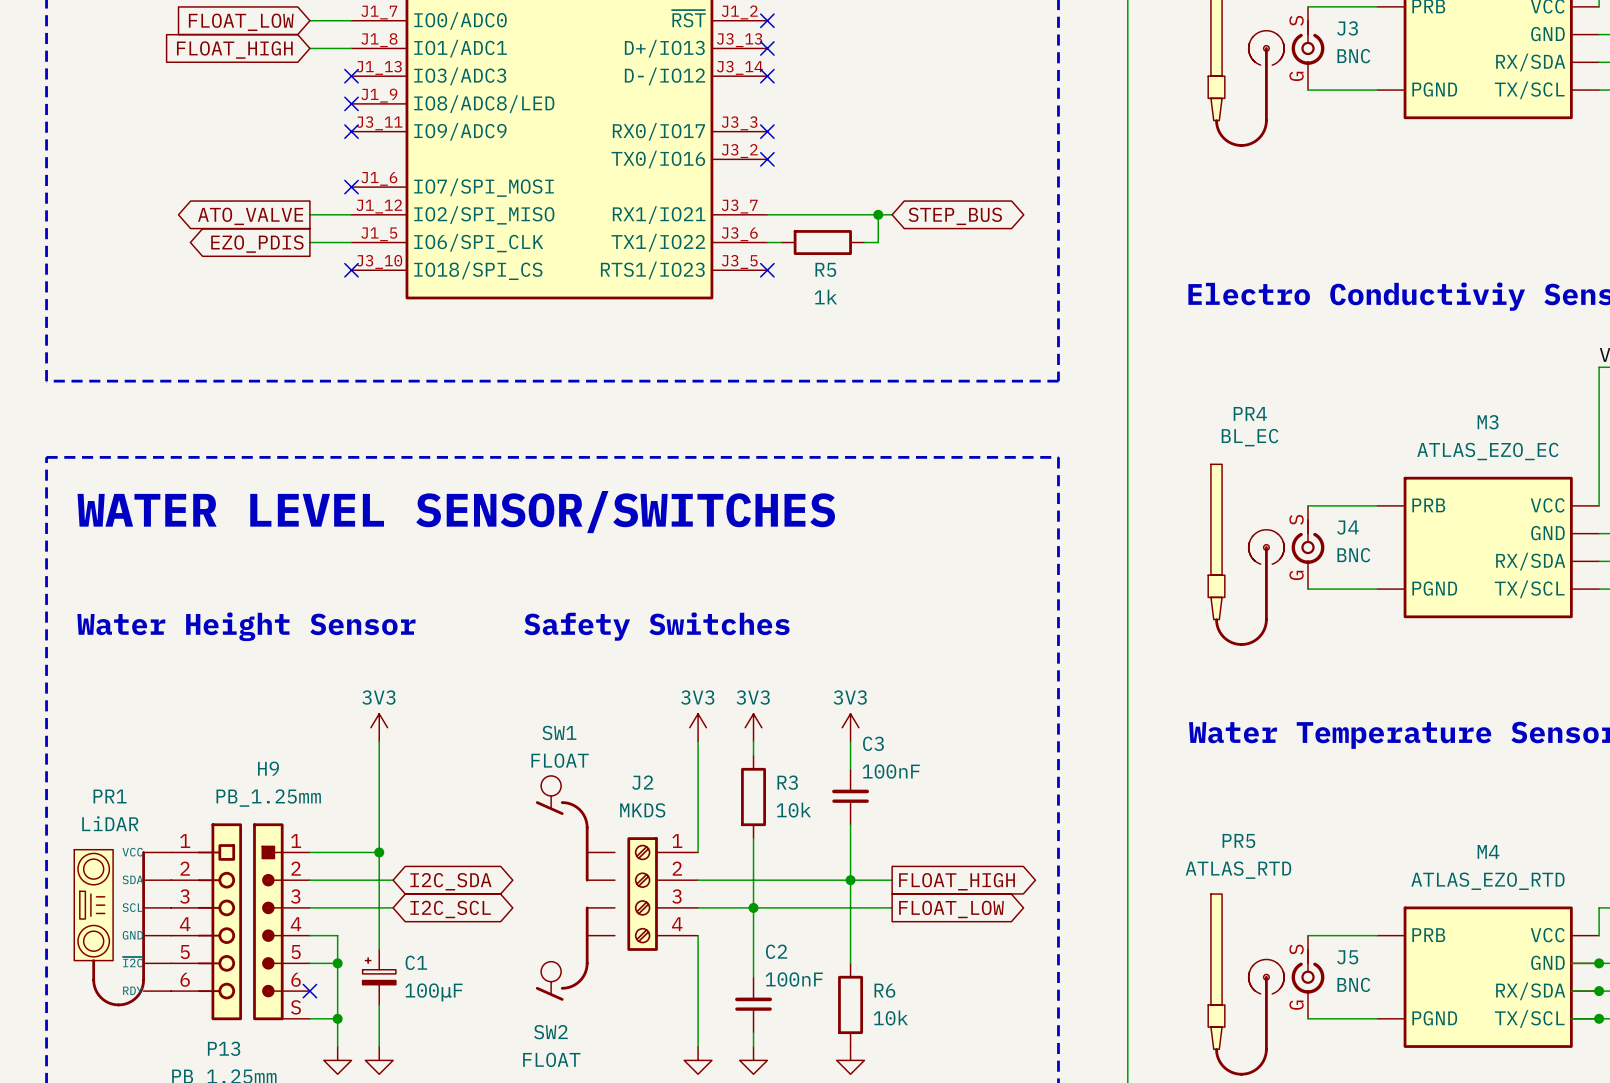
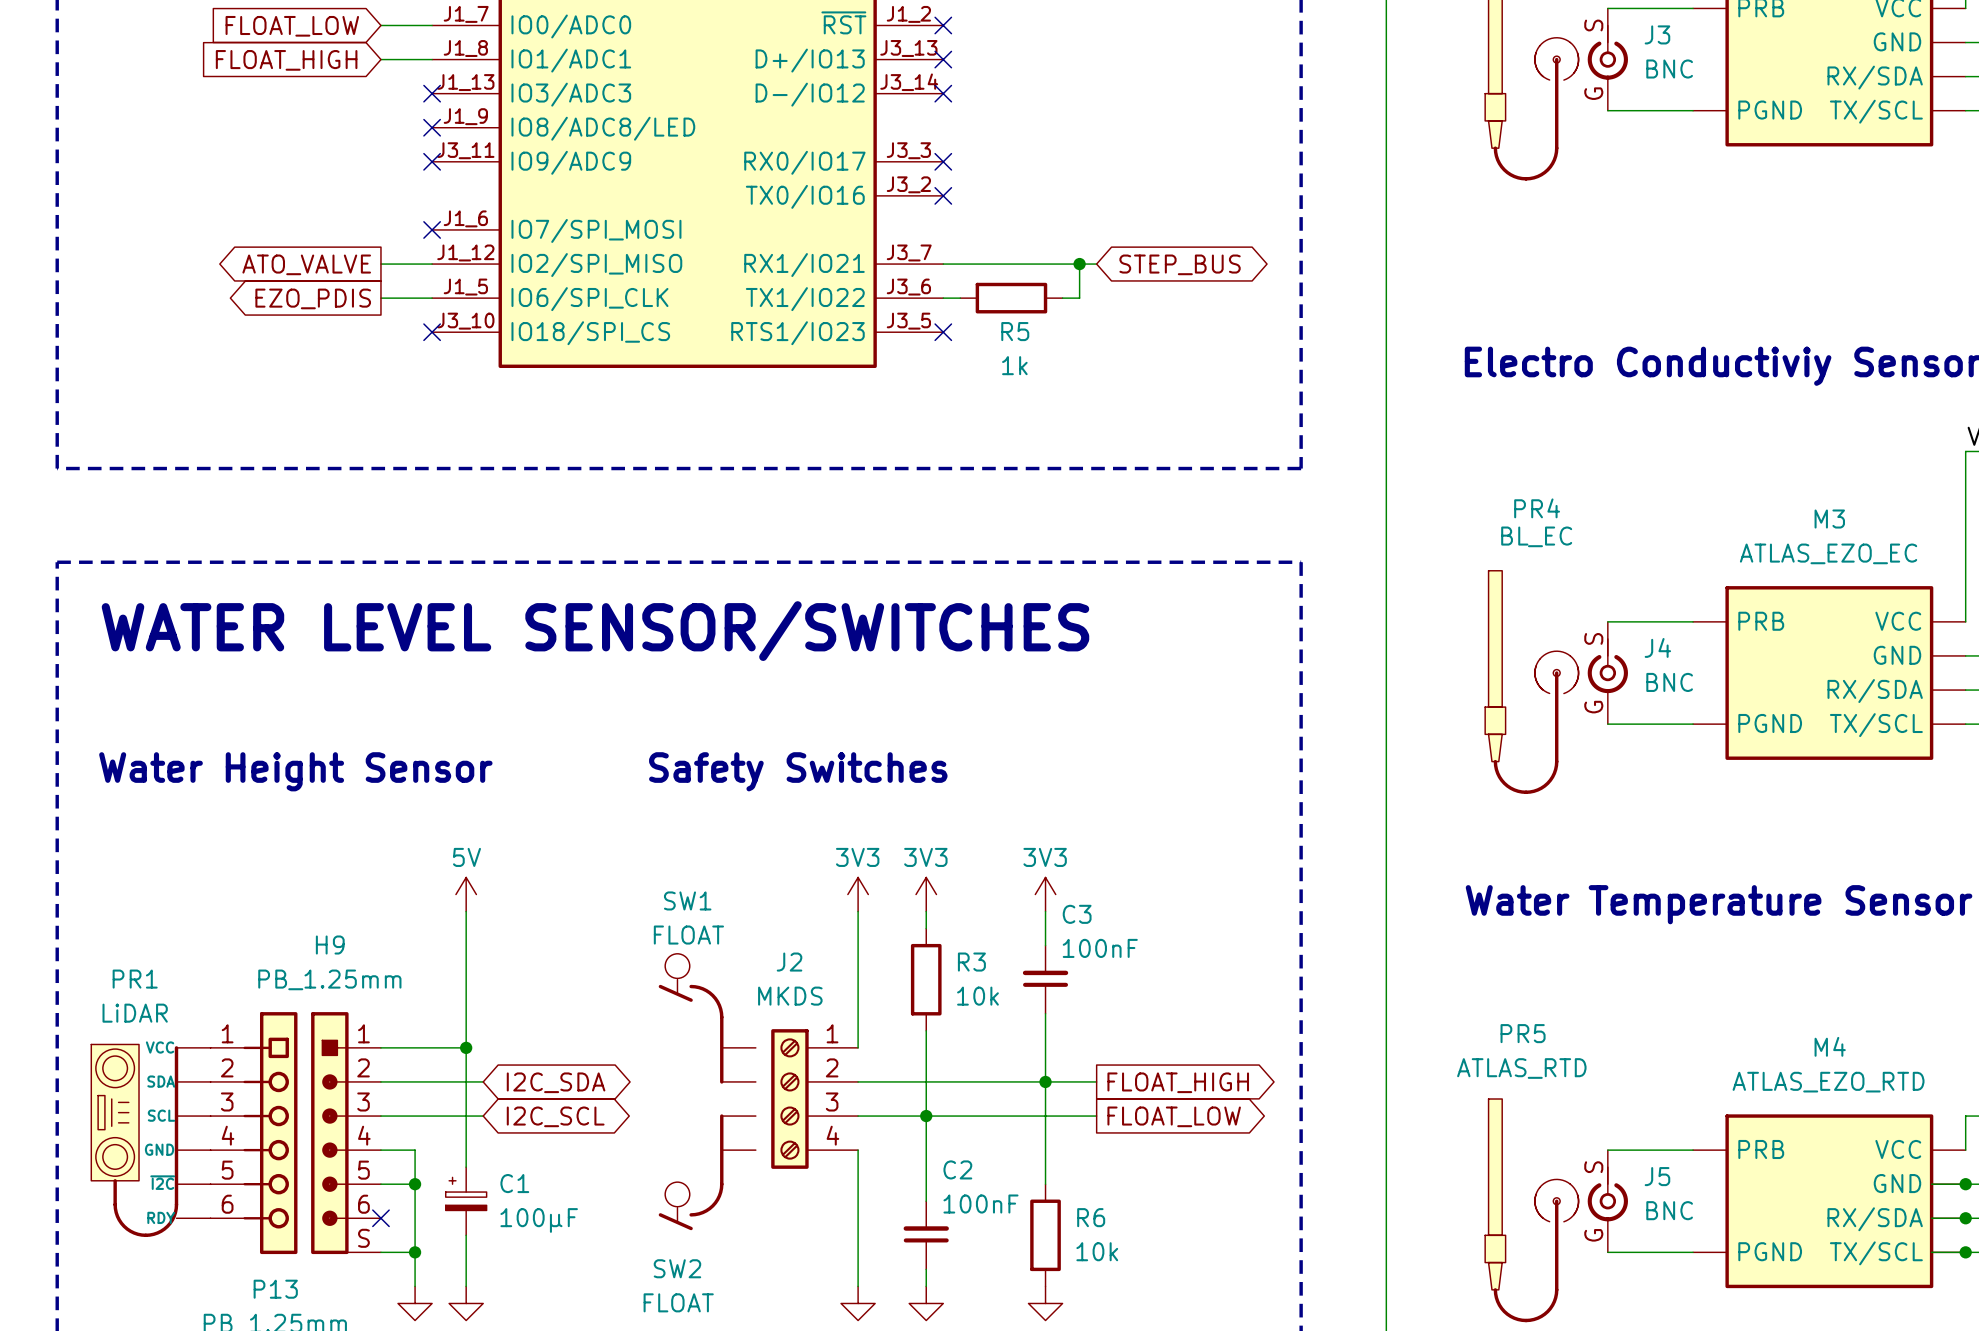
power symbol: 3V3 (379, 727) -> 5V (466, 894)

